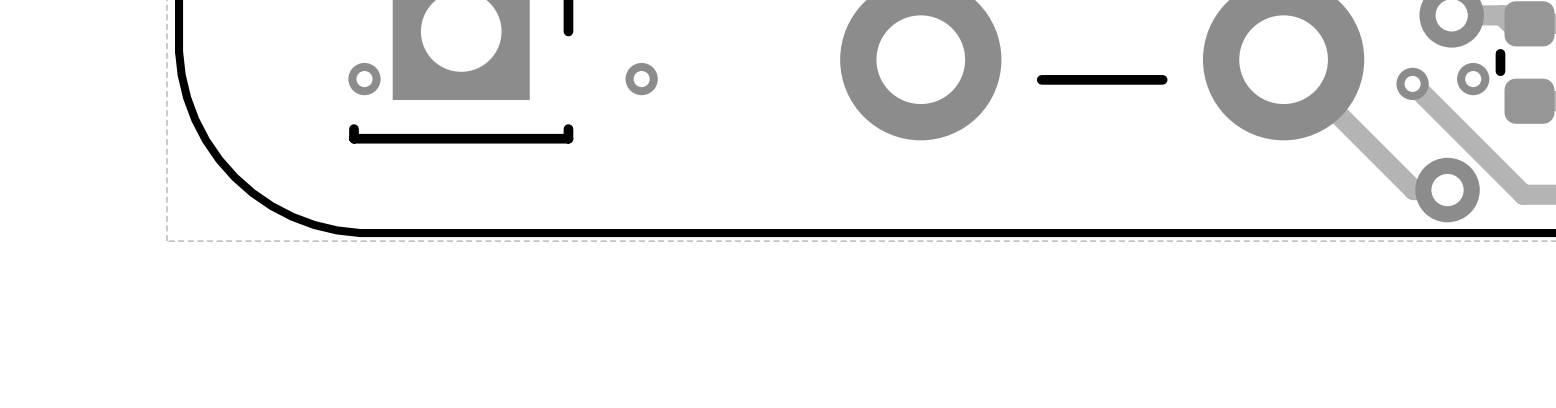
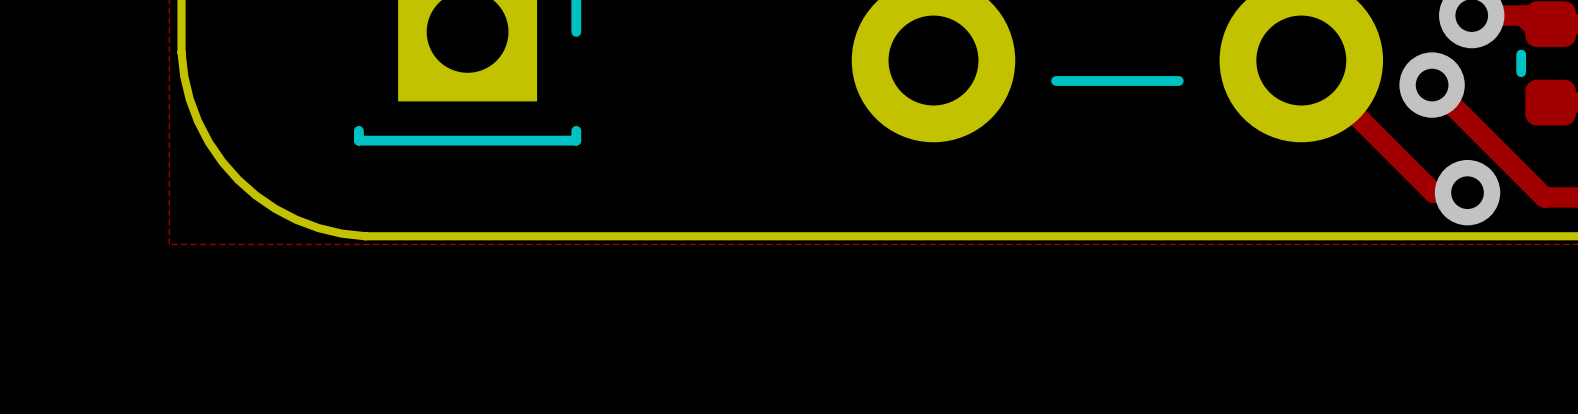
via size: [1396, 67, 1429, 101] -> [1399, 52, 1465, 118]
via: (364, 79) -> none
via: (641, 79) -> none
via: (1473, 79) -> none

